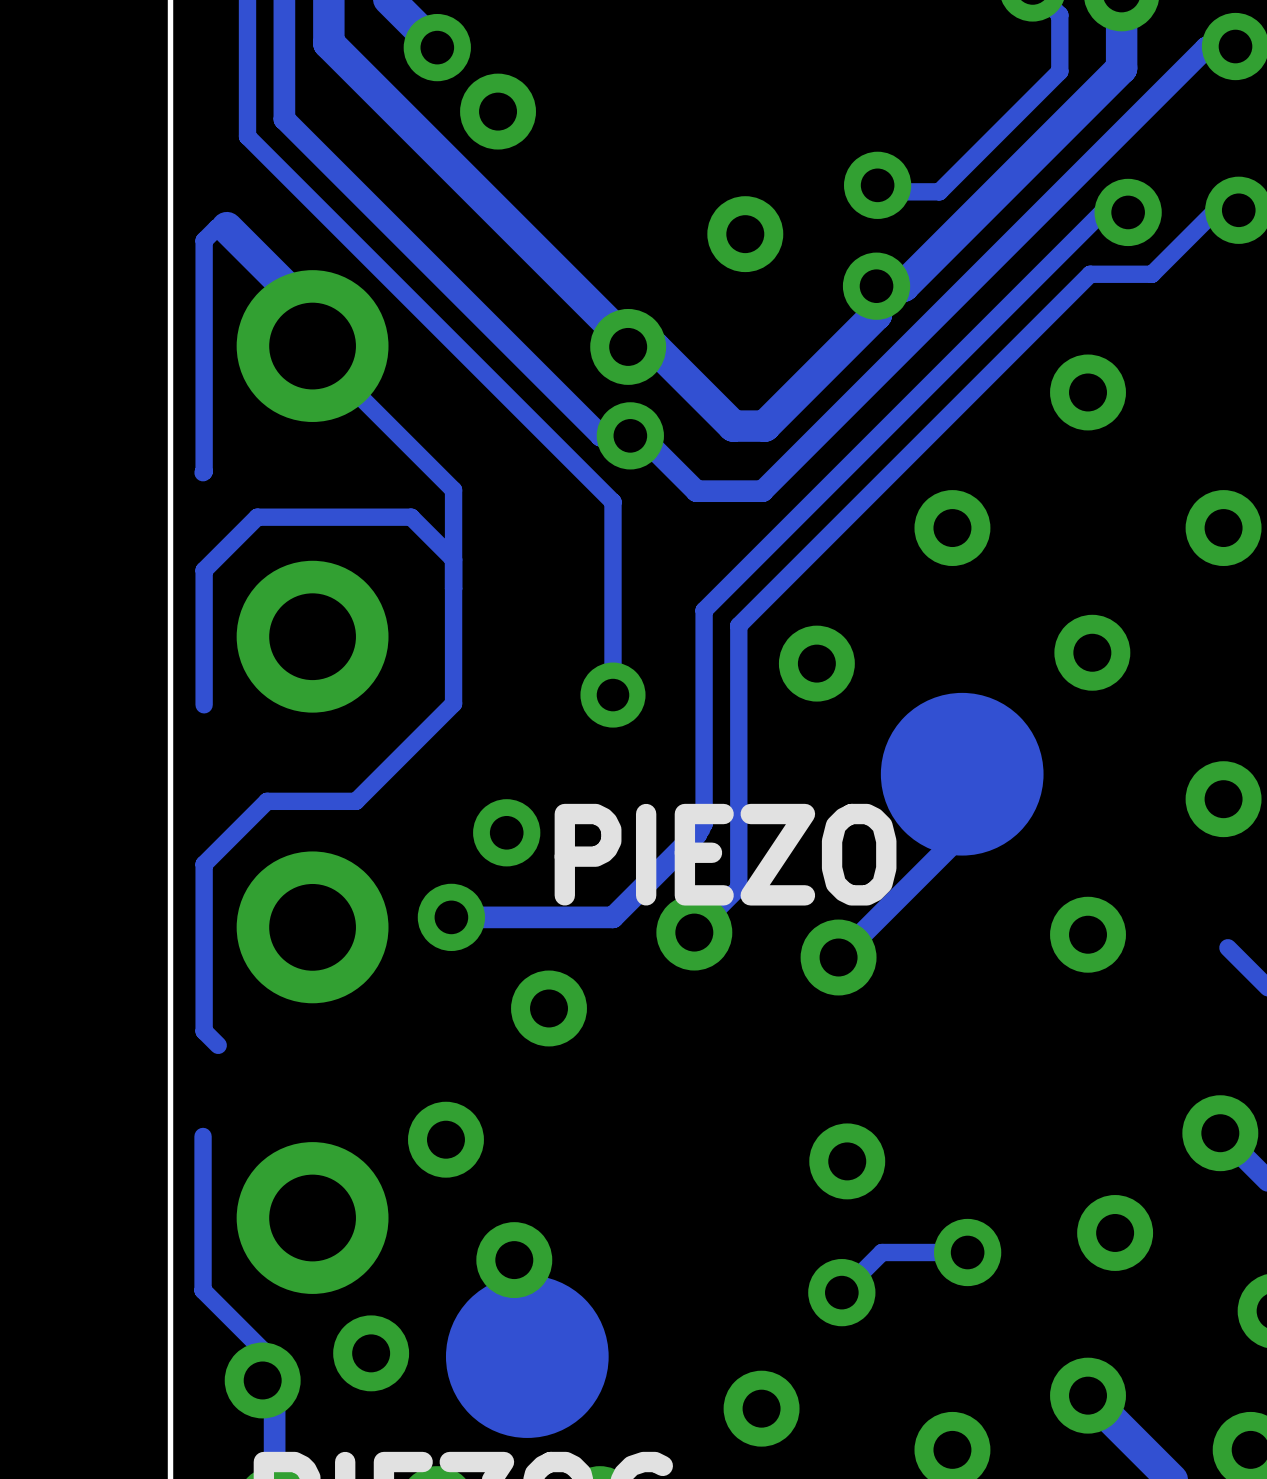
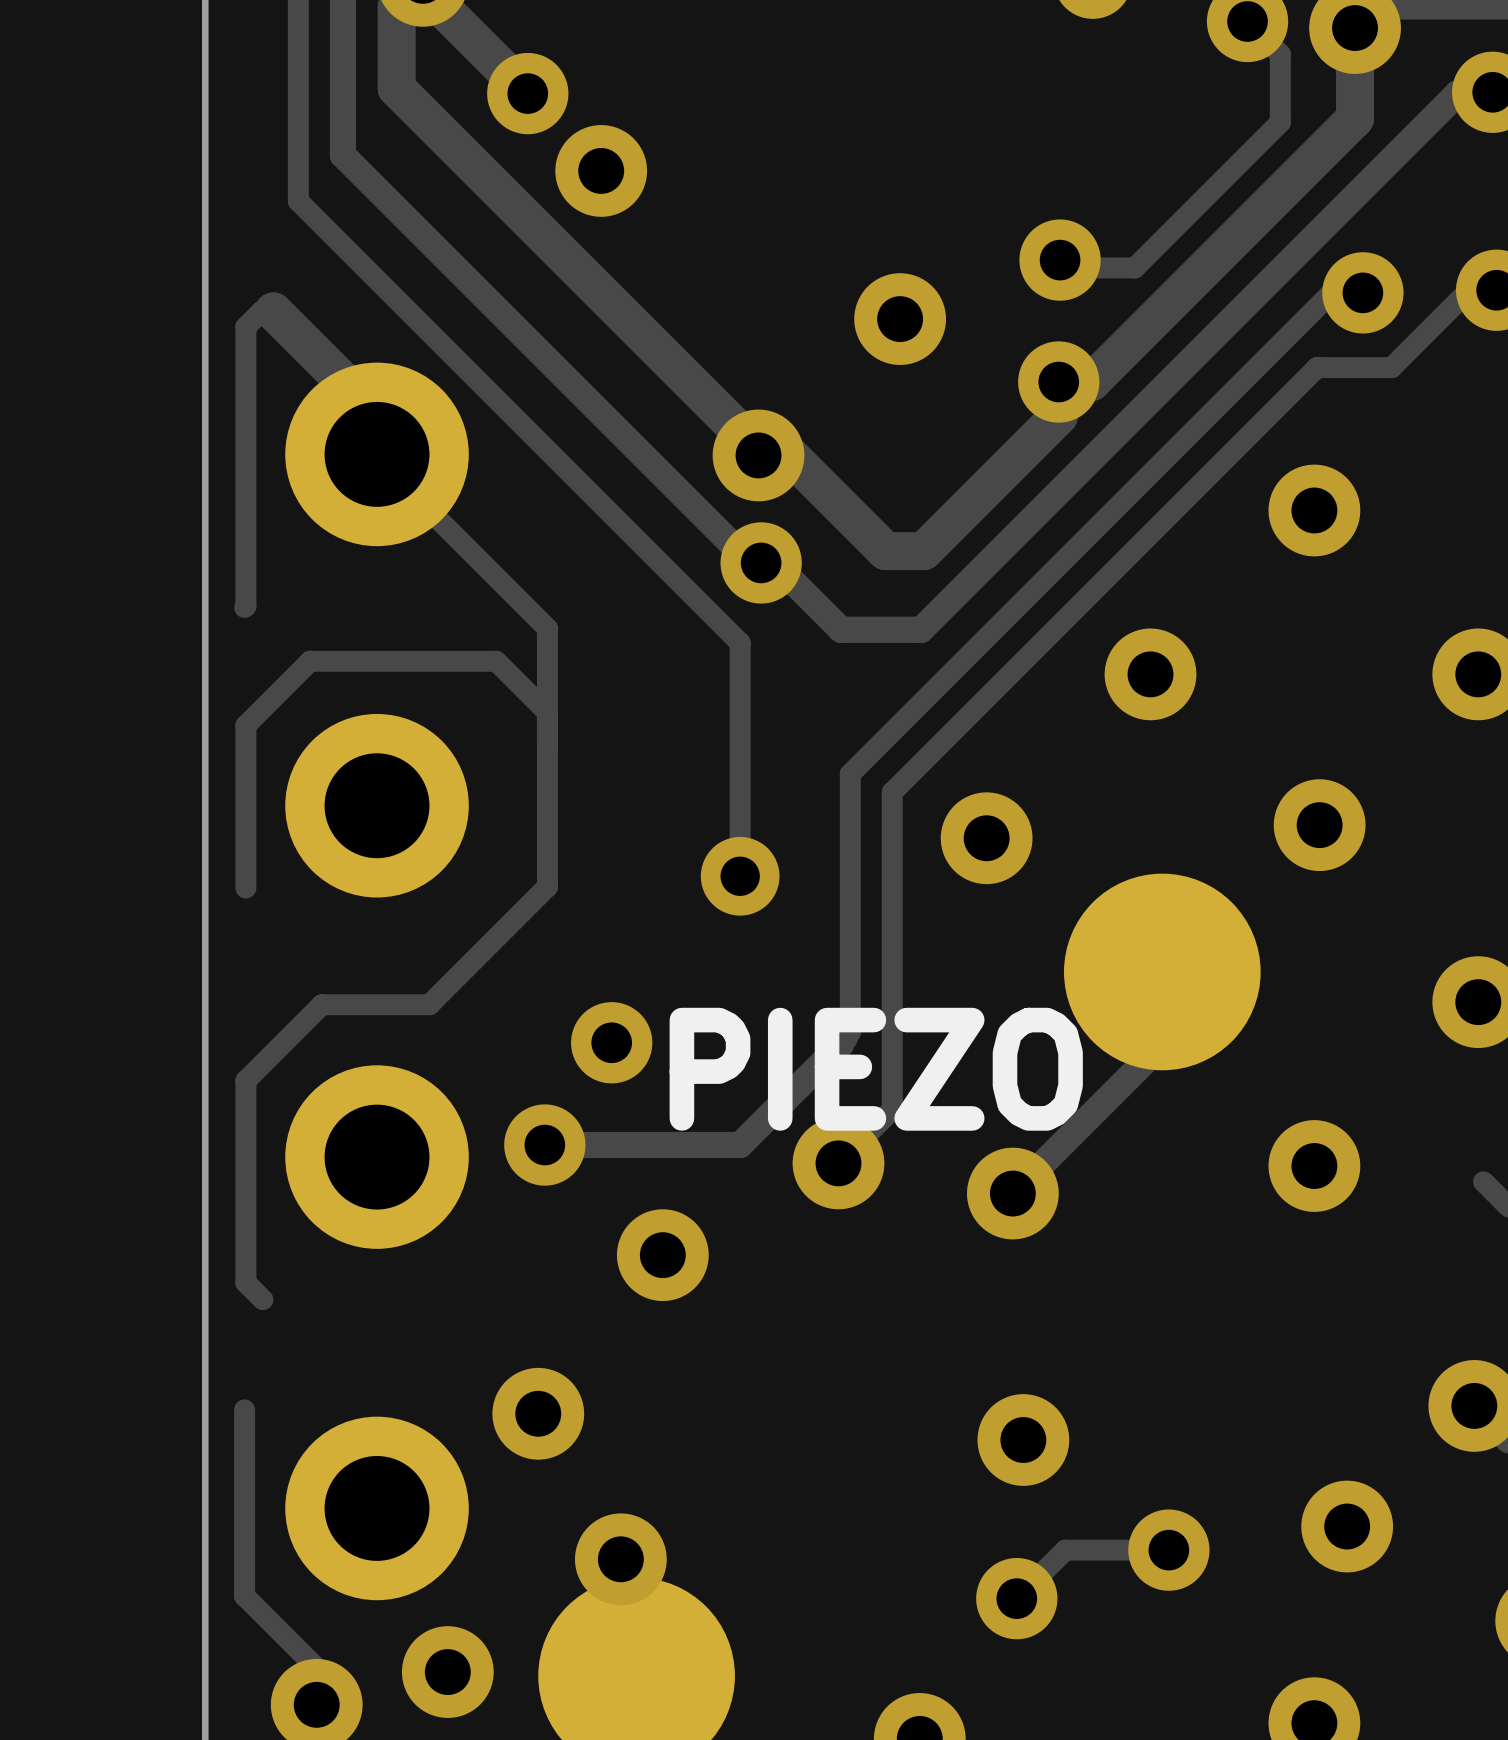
track: (284, 98) (284, 119) (601, 435) (621, 435) -> (342, 155) (750, 562)

